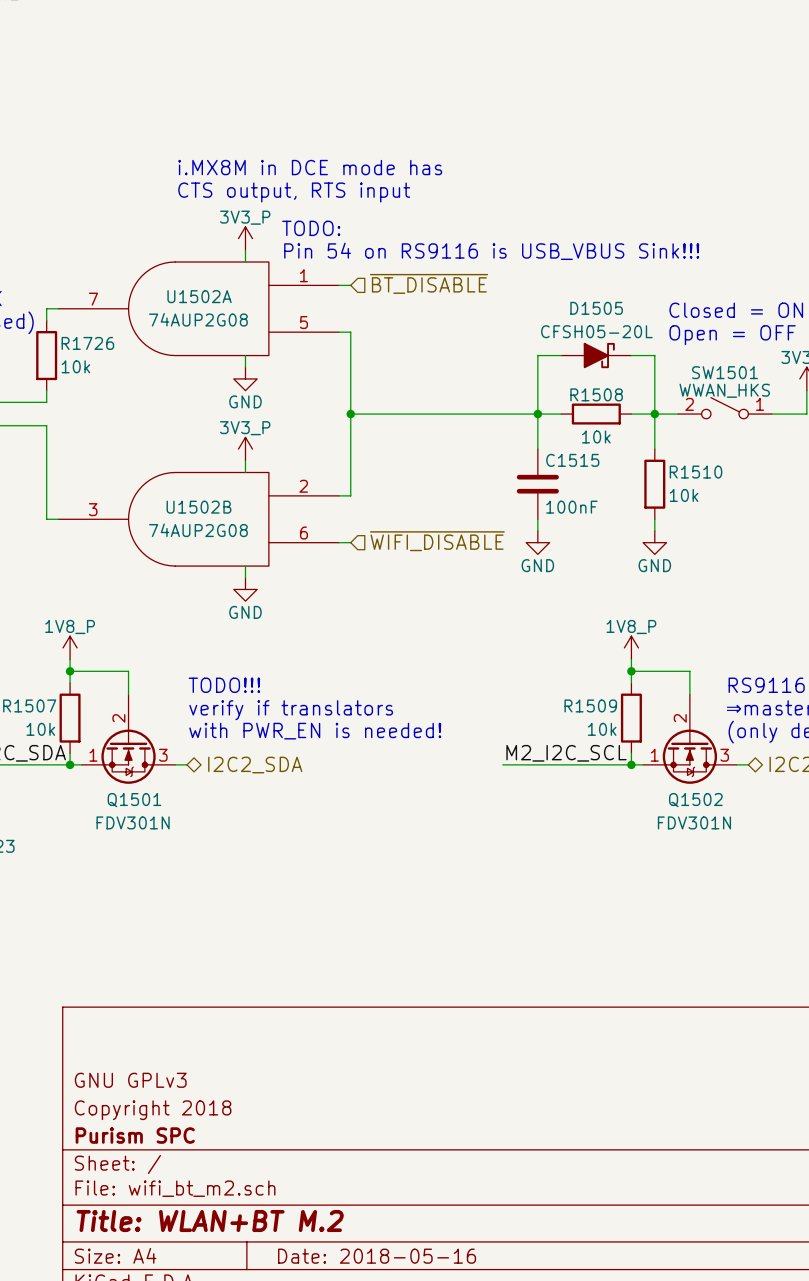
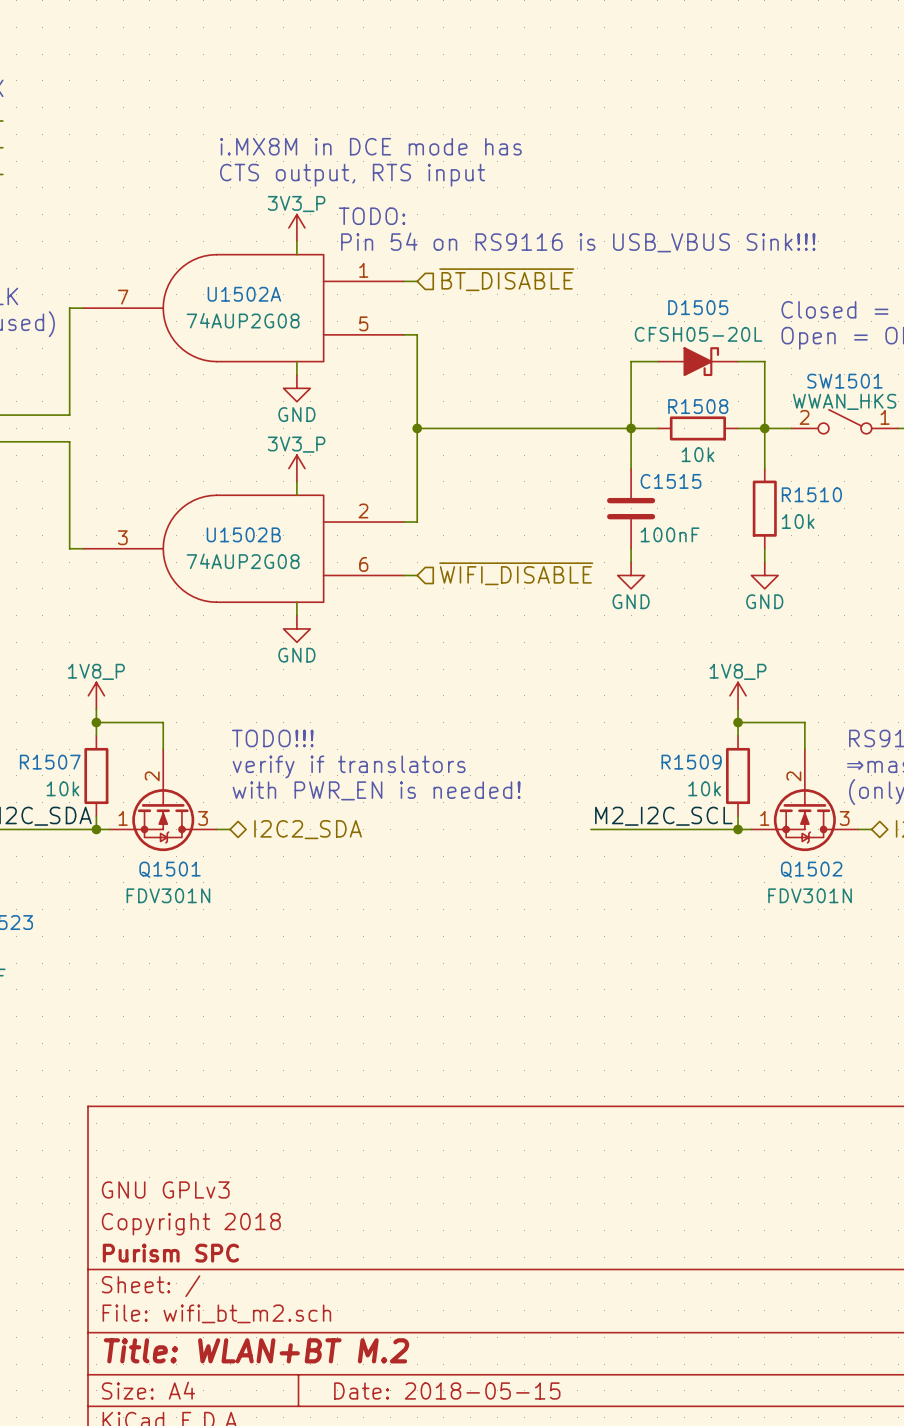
wire: none -> (69, 321) (69, 401)
R1726: 10k (46, 355) -> none
title block: Date: 2018-05-16 (377, 1256) -> Date: 2018-05-15 (447, 1391)

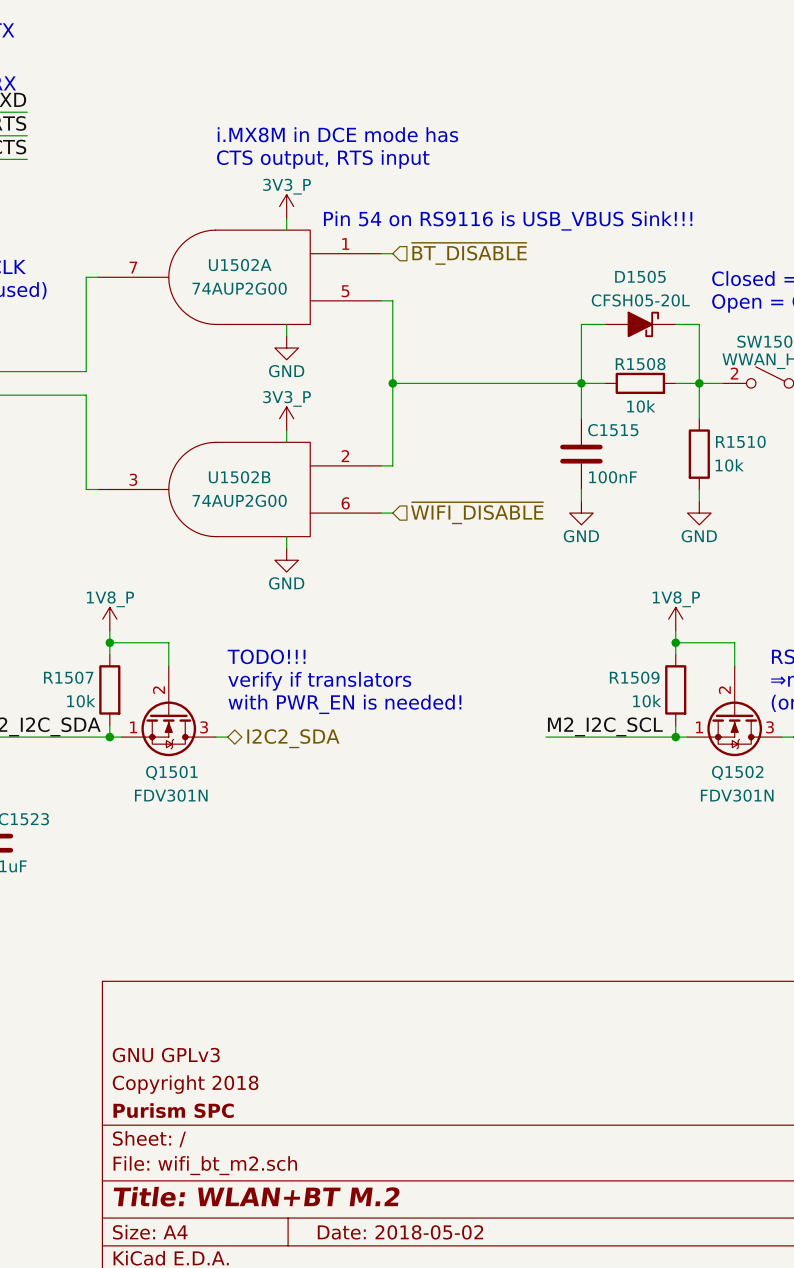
text: TODO: (372, 216) -> none
U1502A value: 74AUP2G08 (243, 320) -> 74AUP2G00 (239, 288)
U1502B value: 74AUP2G08 (243, 561) -> 74AUP2G00 (239, 500)
title block: Date: 2018-05-15 (447, 1391) -> Date: 2018-05-02 (400, 1232)

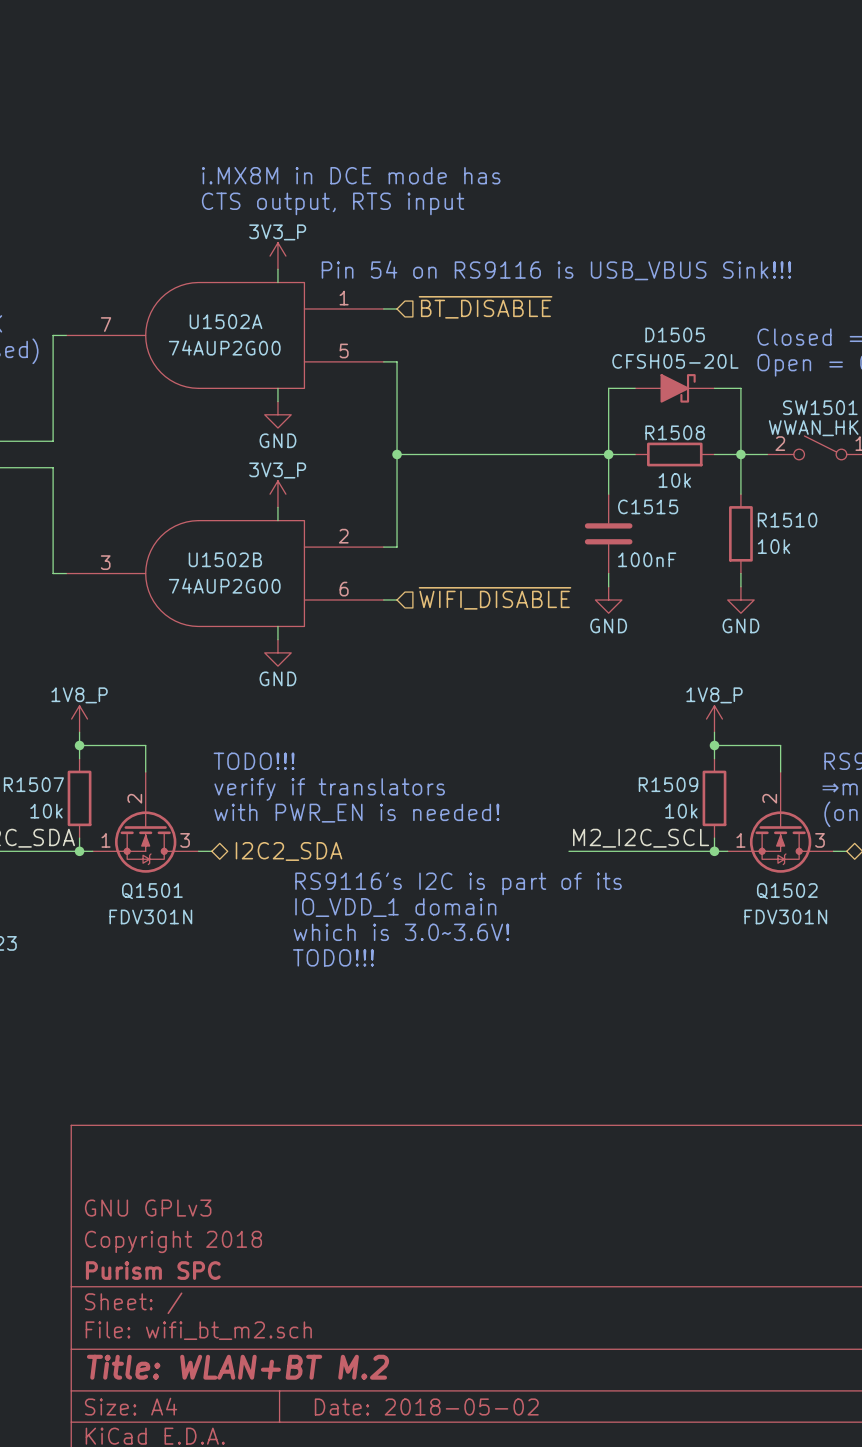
text: none -> RS9116's I2C is part of its (458, 883)
text: none -> IO_VDD_1 domain (395, 907)
text: none -> which is 3.0~3.6V! (401, 932)
text: none -> TODO!!! (333, 957)

